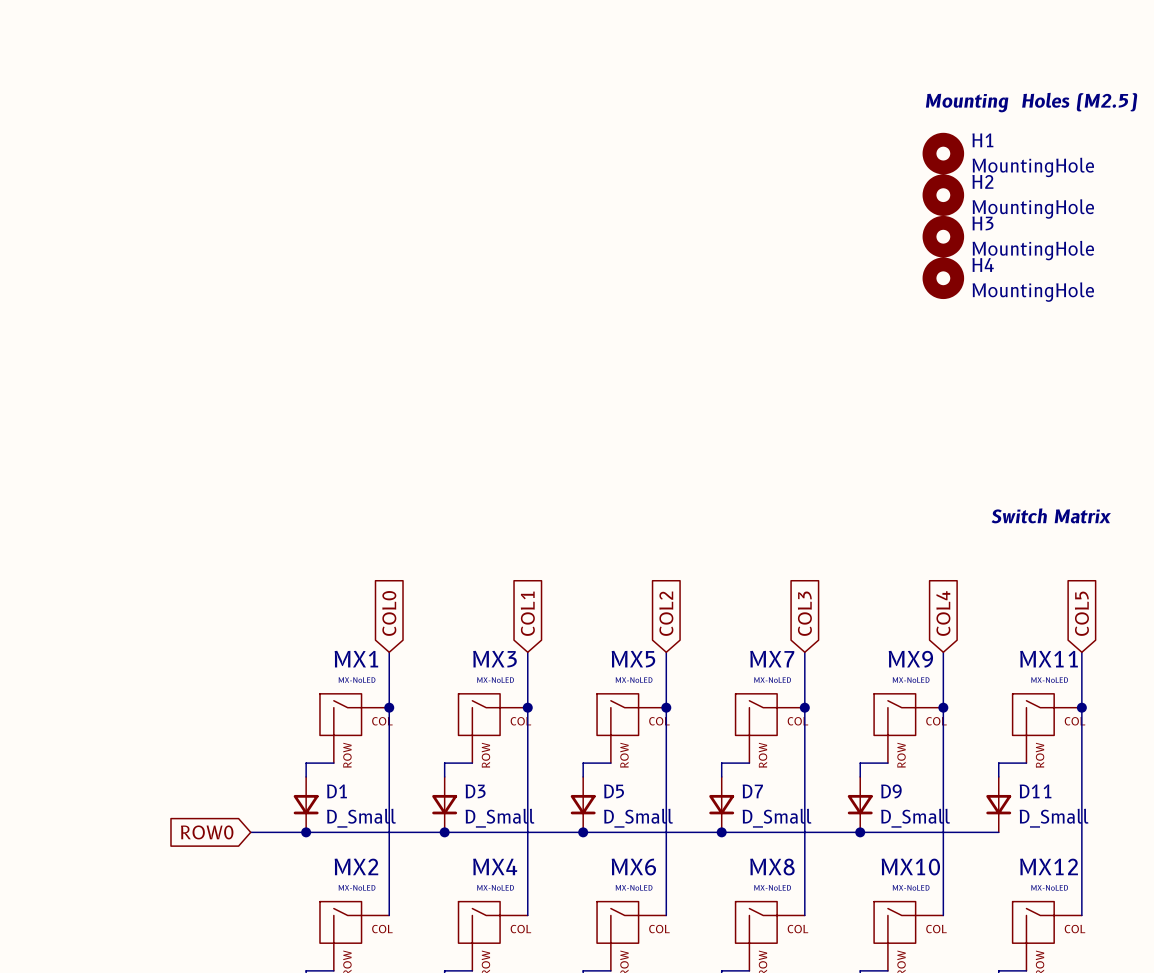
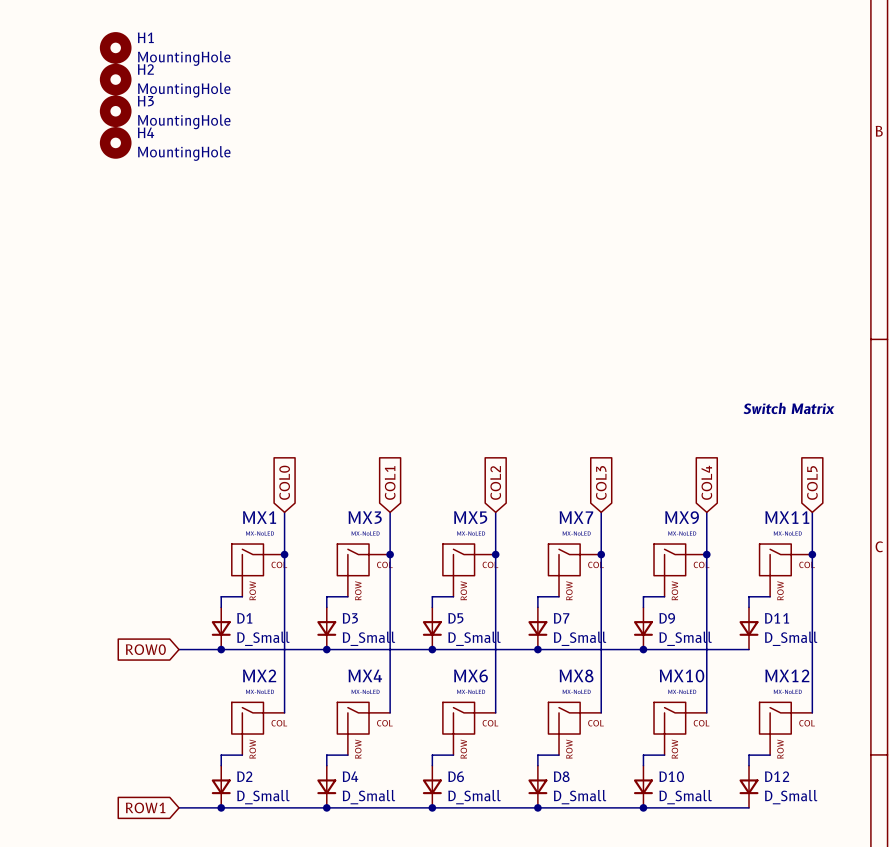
text: Mounting Holes (M2.5) (1031, 102) -> none
H1 position: (943, 153) -> (115, 47)
H2 position: (943, 195) -> (115, 79)
H3 position: (943, 236) -> (115, 111)
H4 position: (943, 278) -> (115, 142)

